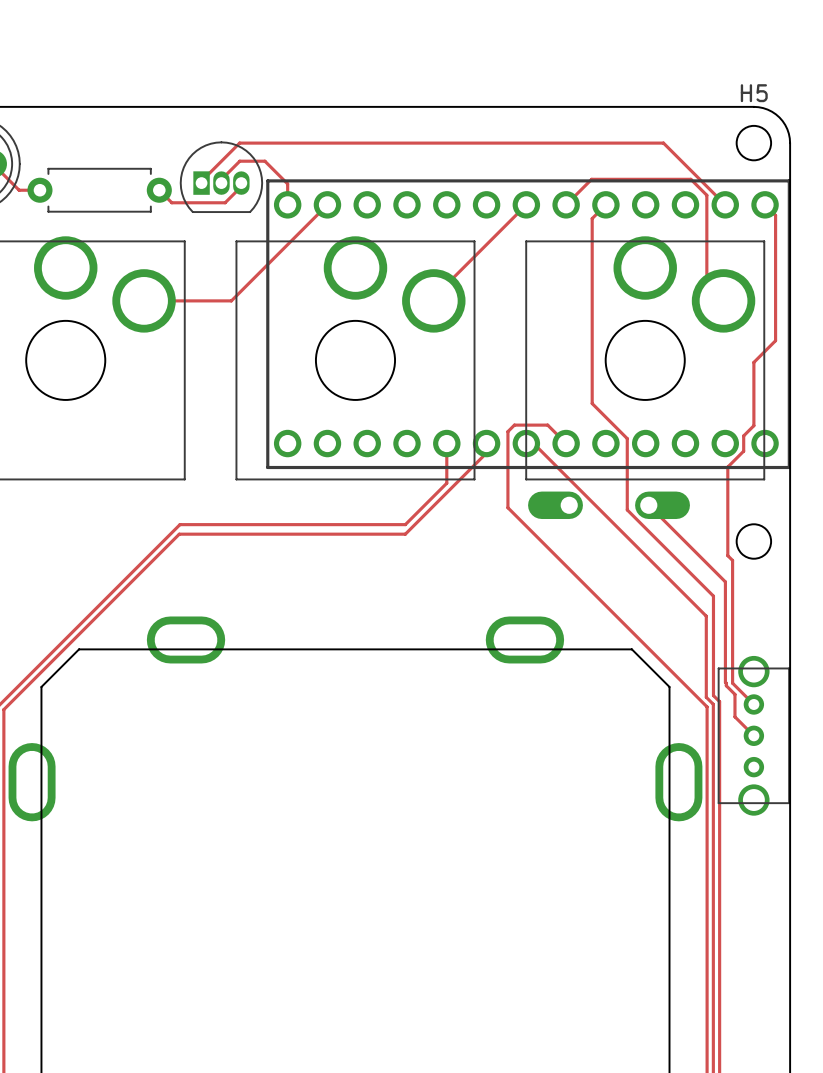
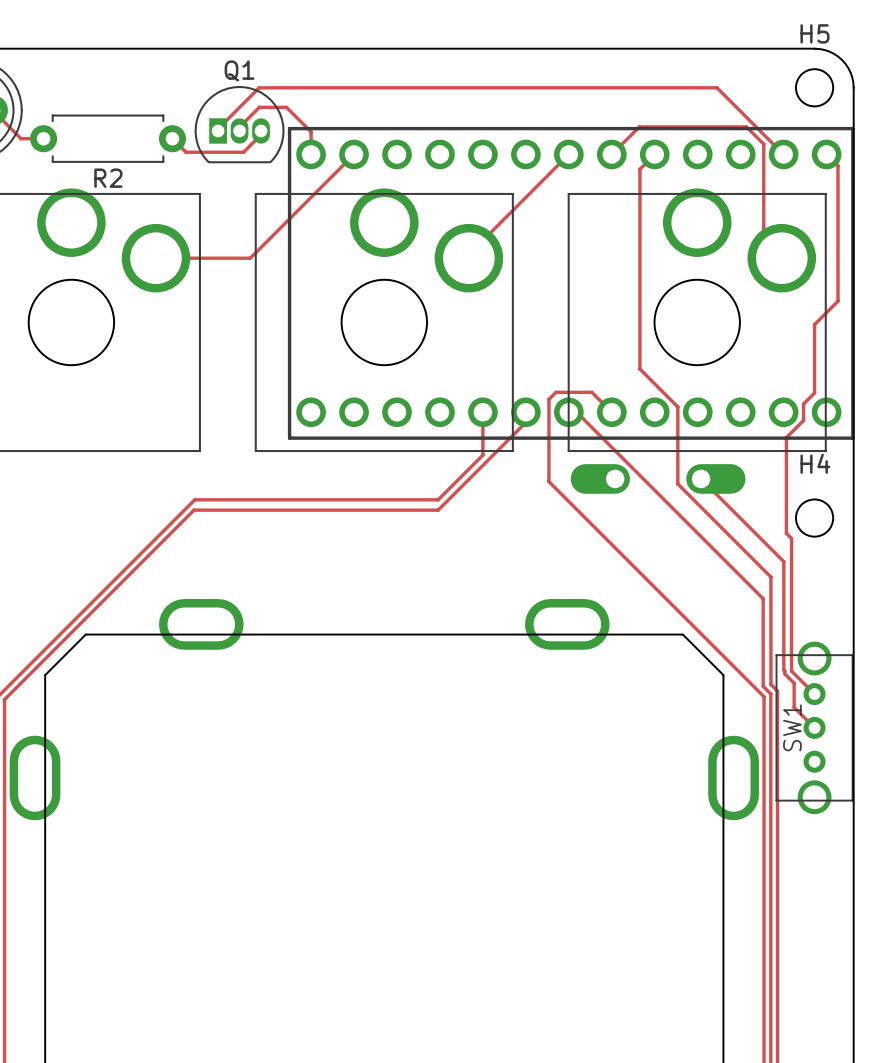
Q1 name: none -> Q1 (239, 70)
R2 name: none -> R2 (108, 178)
H4 name: none -> H4 (815, 463)
SW1 name: none -> SW1 (792, 727)

